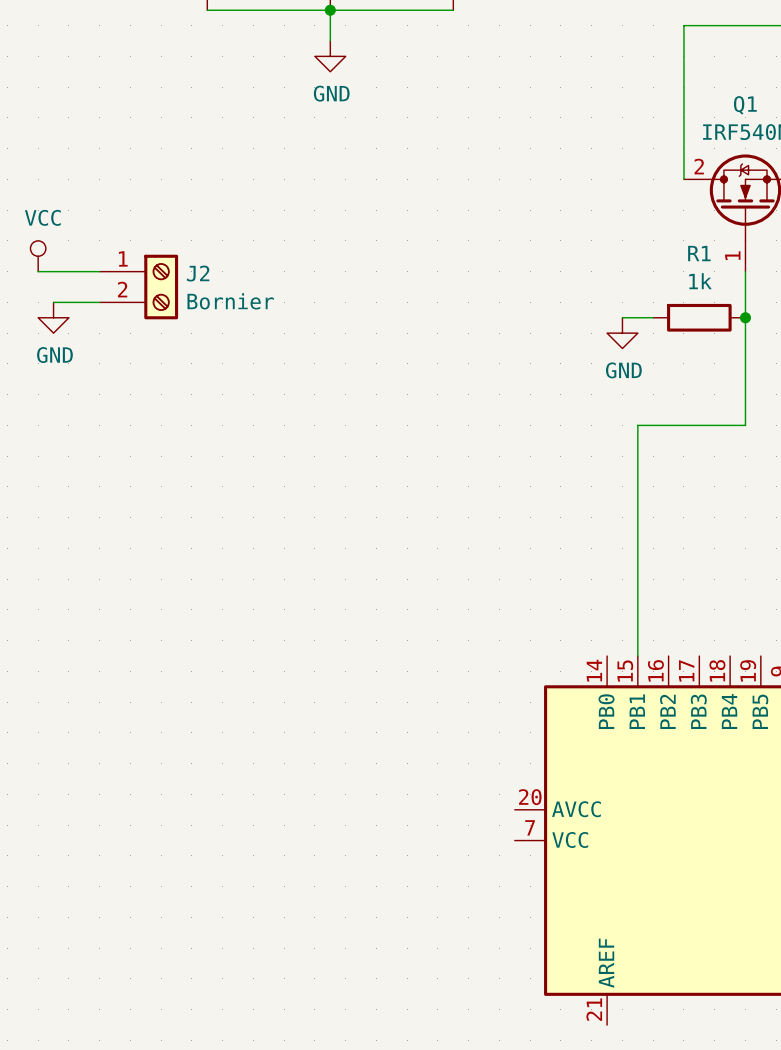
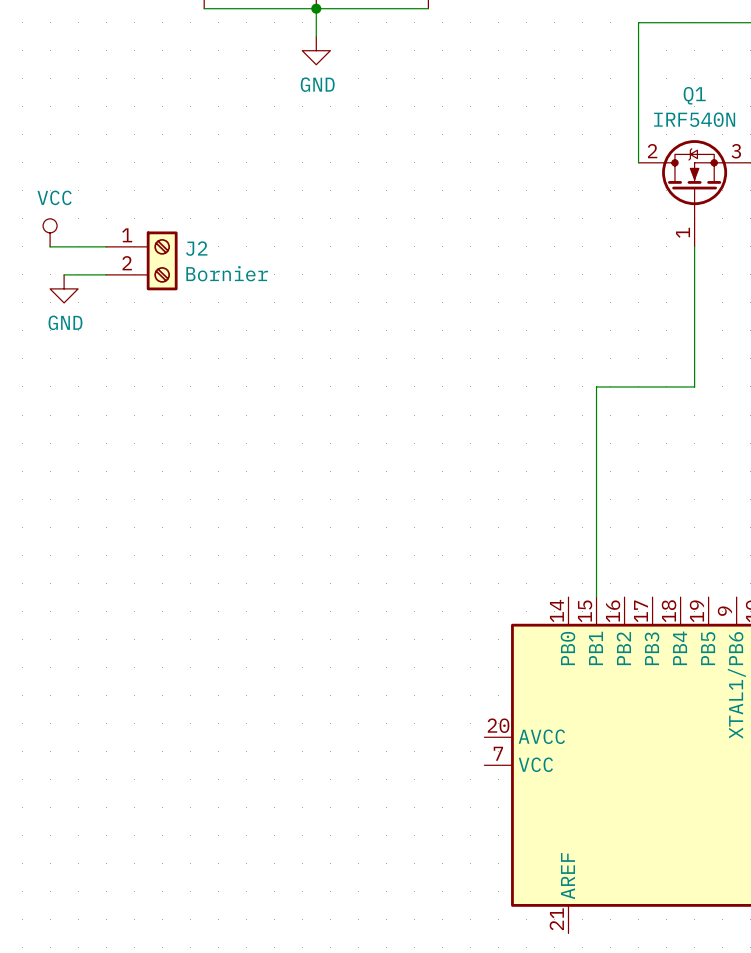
wire: (622, 317) (653, 317) -> none
R1: 1k (699, 317) -> none
junction: (745, 317) -> none
power symbol: GND (622, 333) -> none

